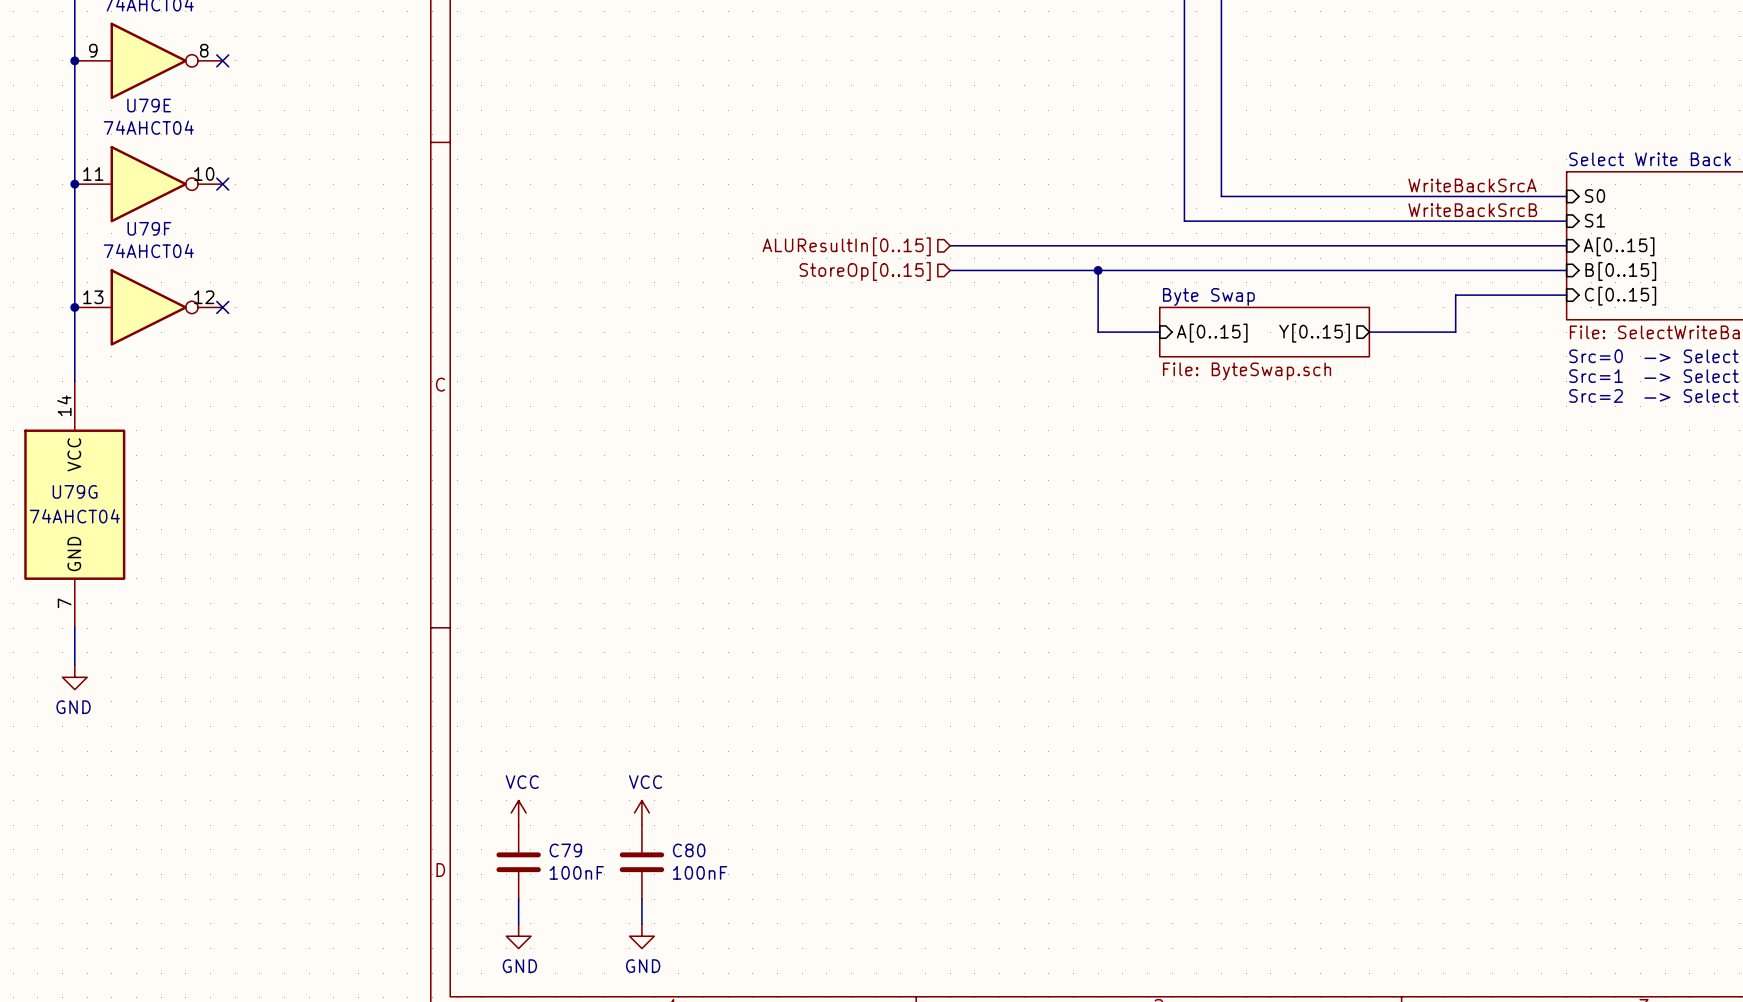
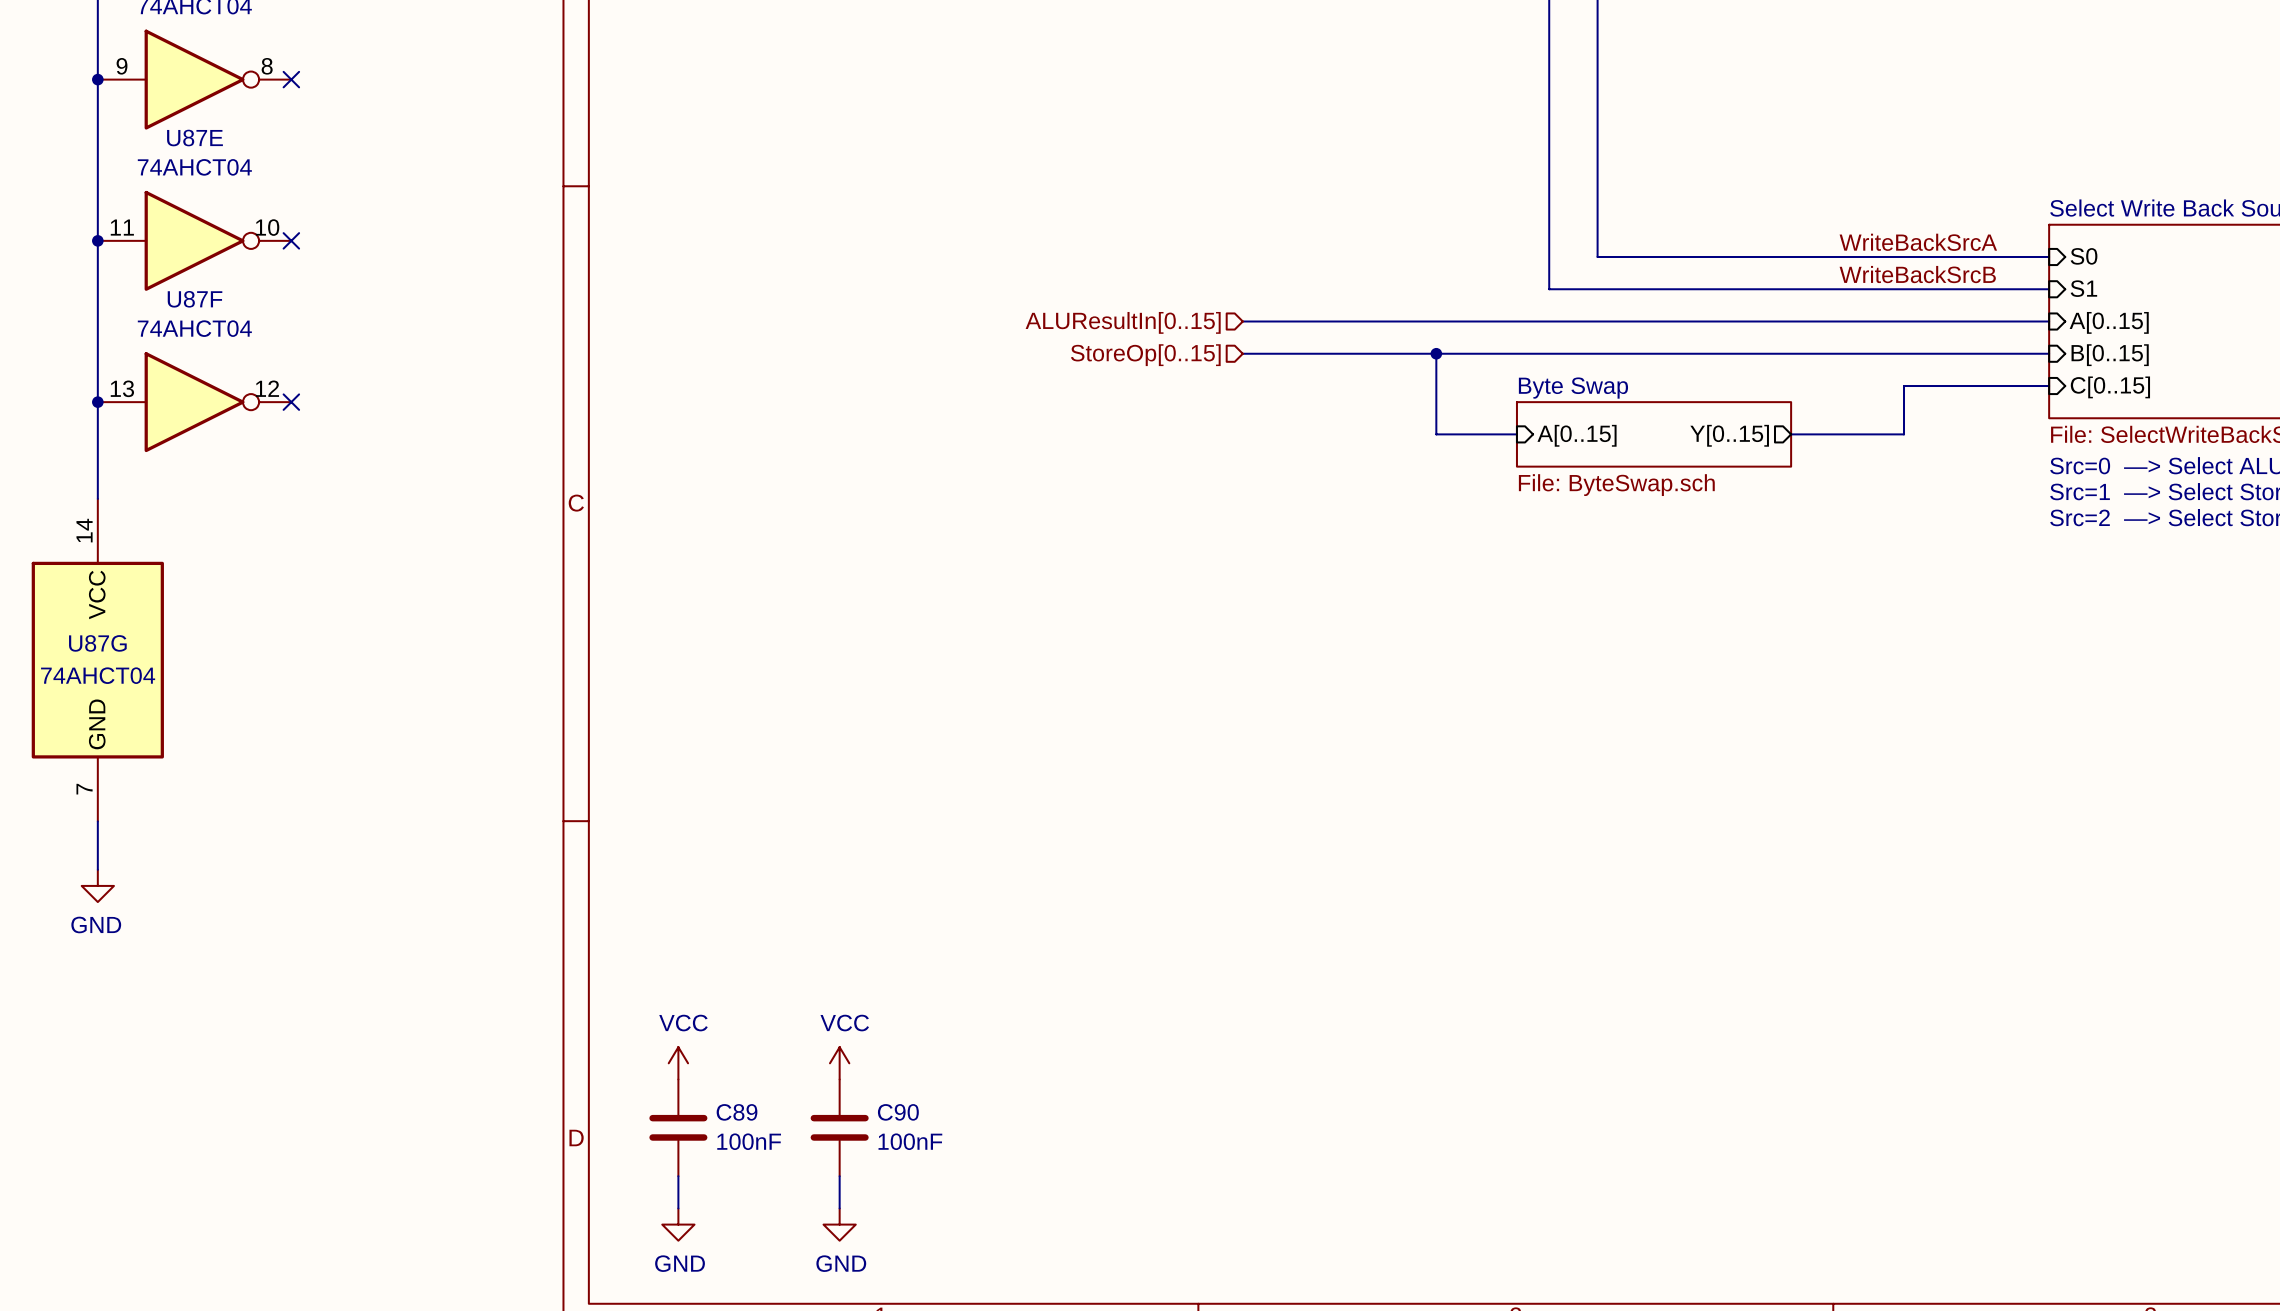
U79E name: U79E (149, 105) -> U87E (194, 138)
U79F name: U79F (149, 228) -> U87F (195, 299)
U79G name: U79G (75, 491) -> U87G (97, 643)
C79 name: C79 (565, 850) -> C89 (737, 1112)
C80 name: C80 (689, 850) -> C90 (898, 1112)

